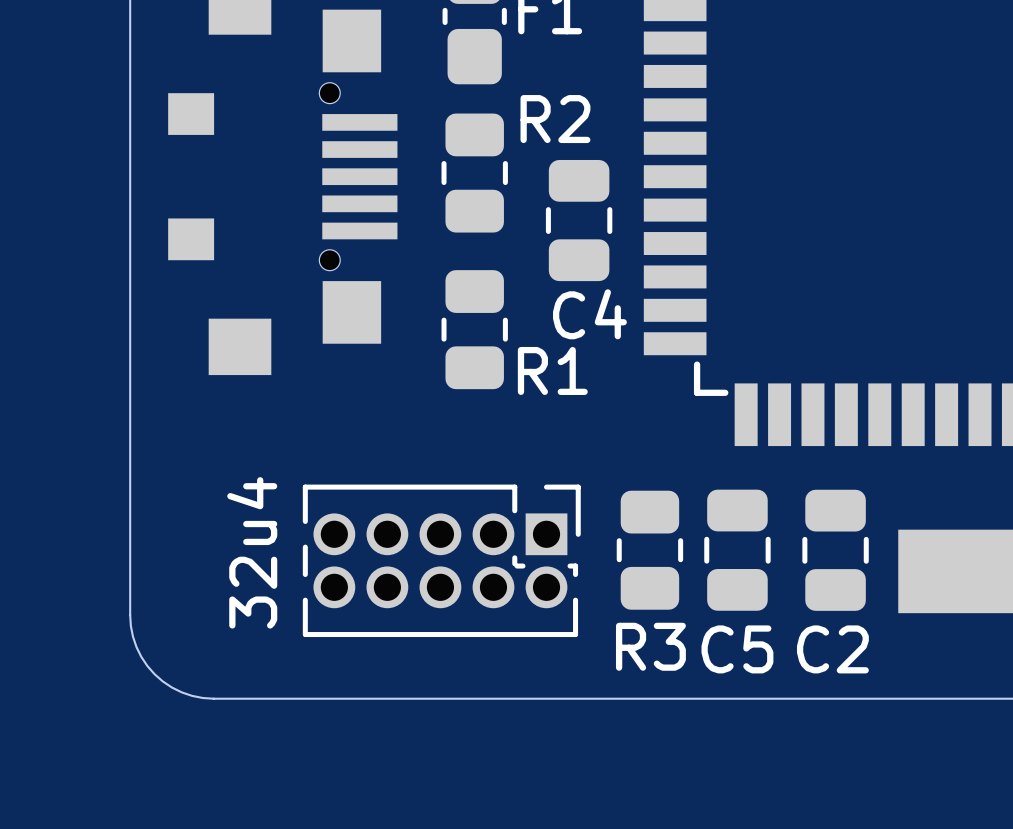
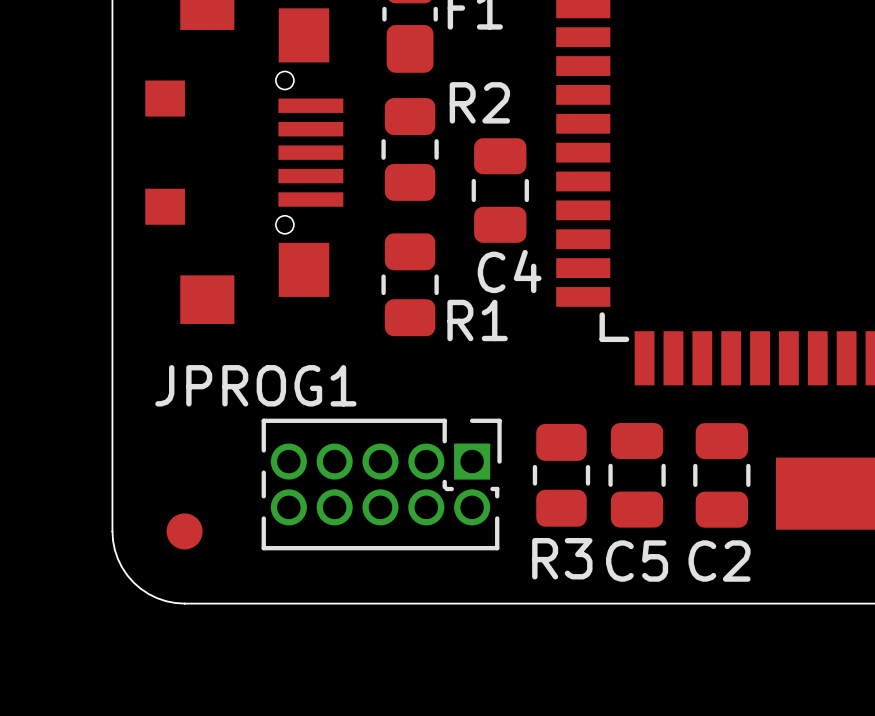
32u4 name: 32u4 (252, 552) -> JPROG1 (255, 385)
part: none -> (184, 531)

